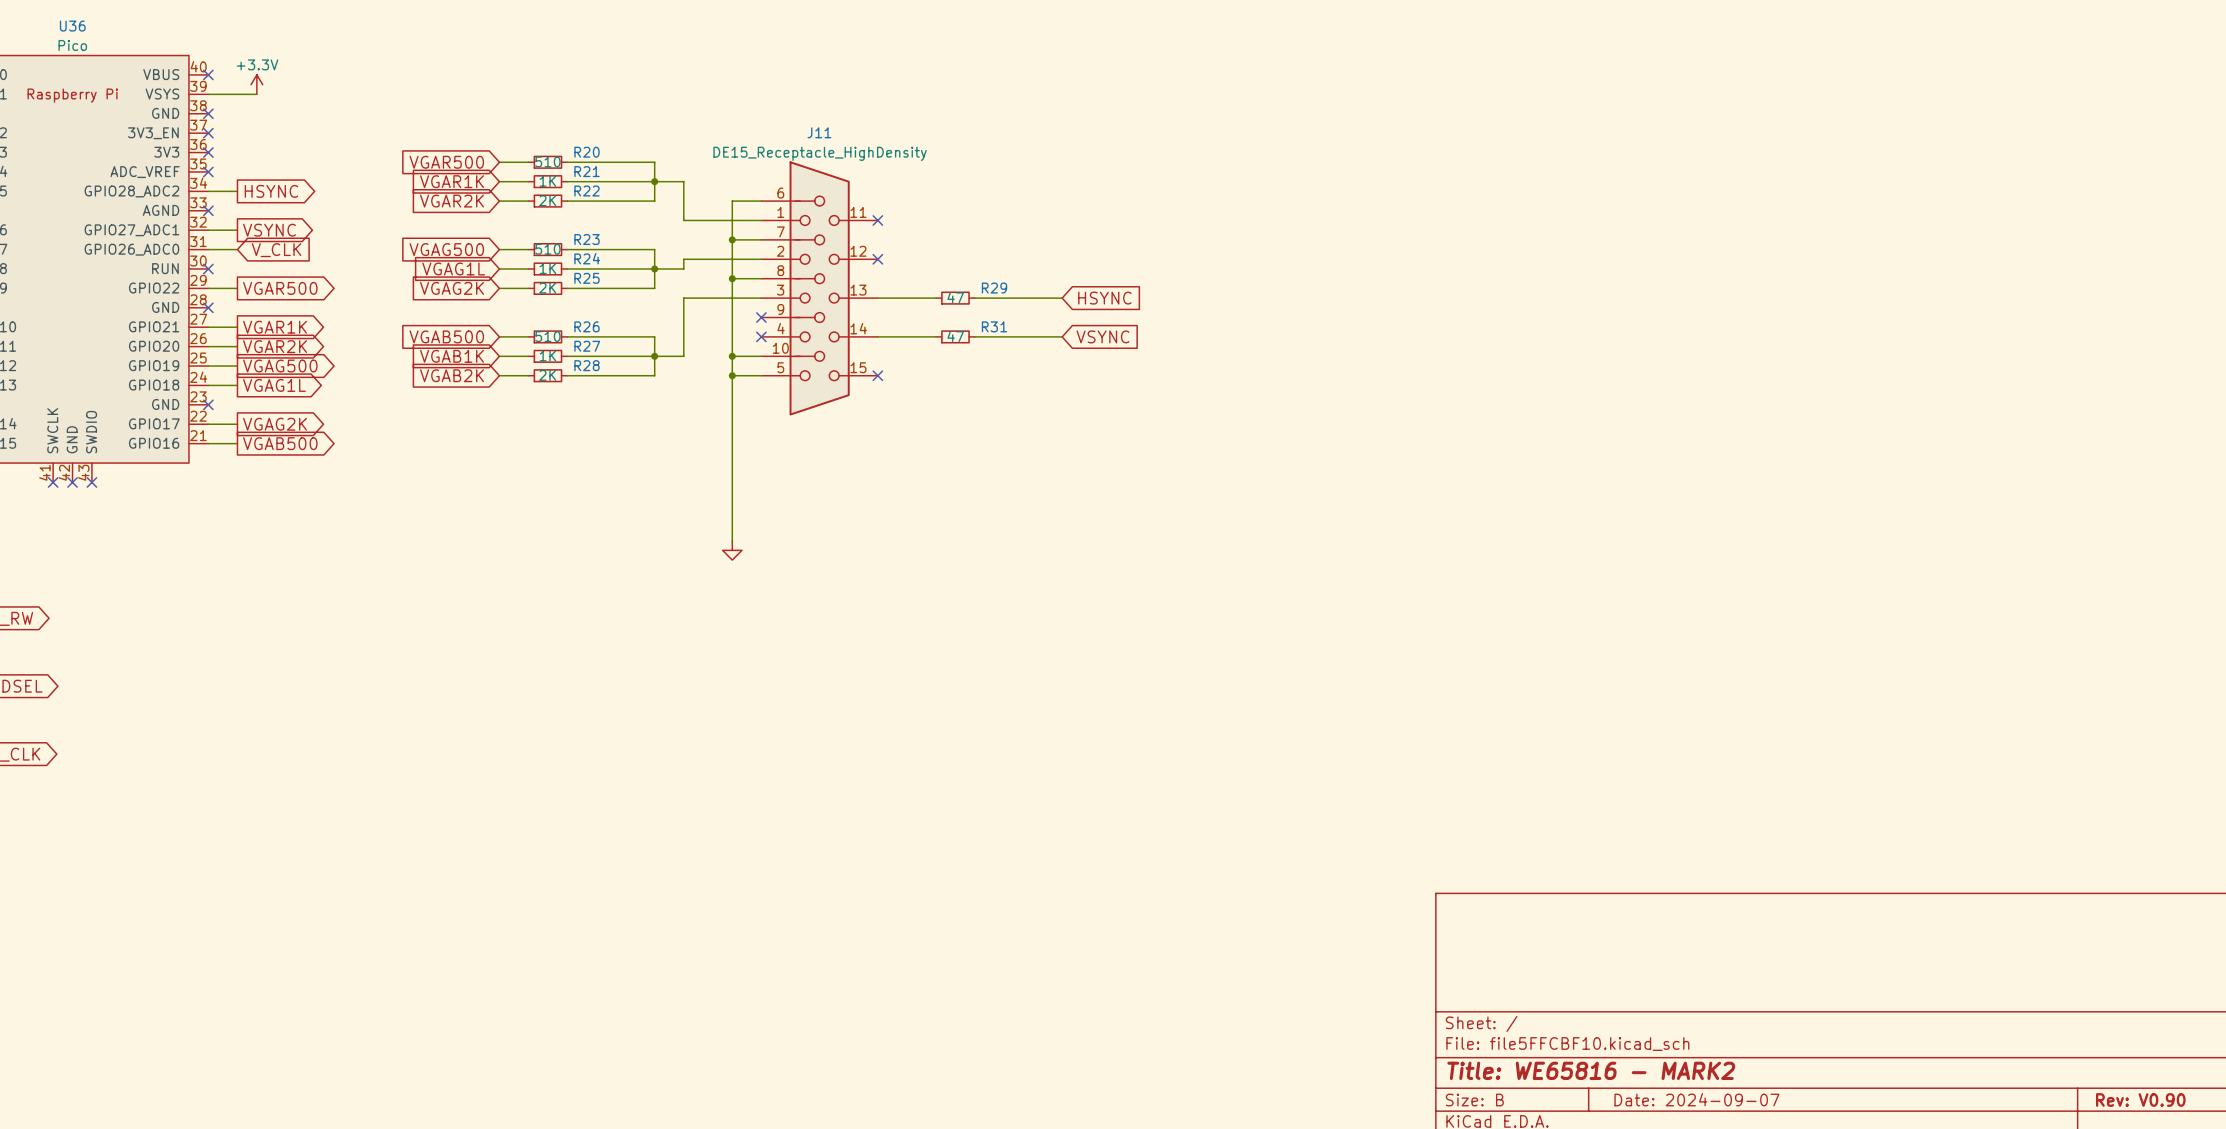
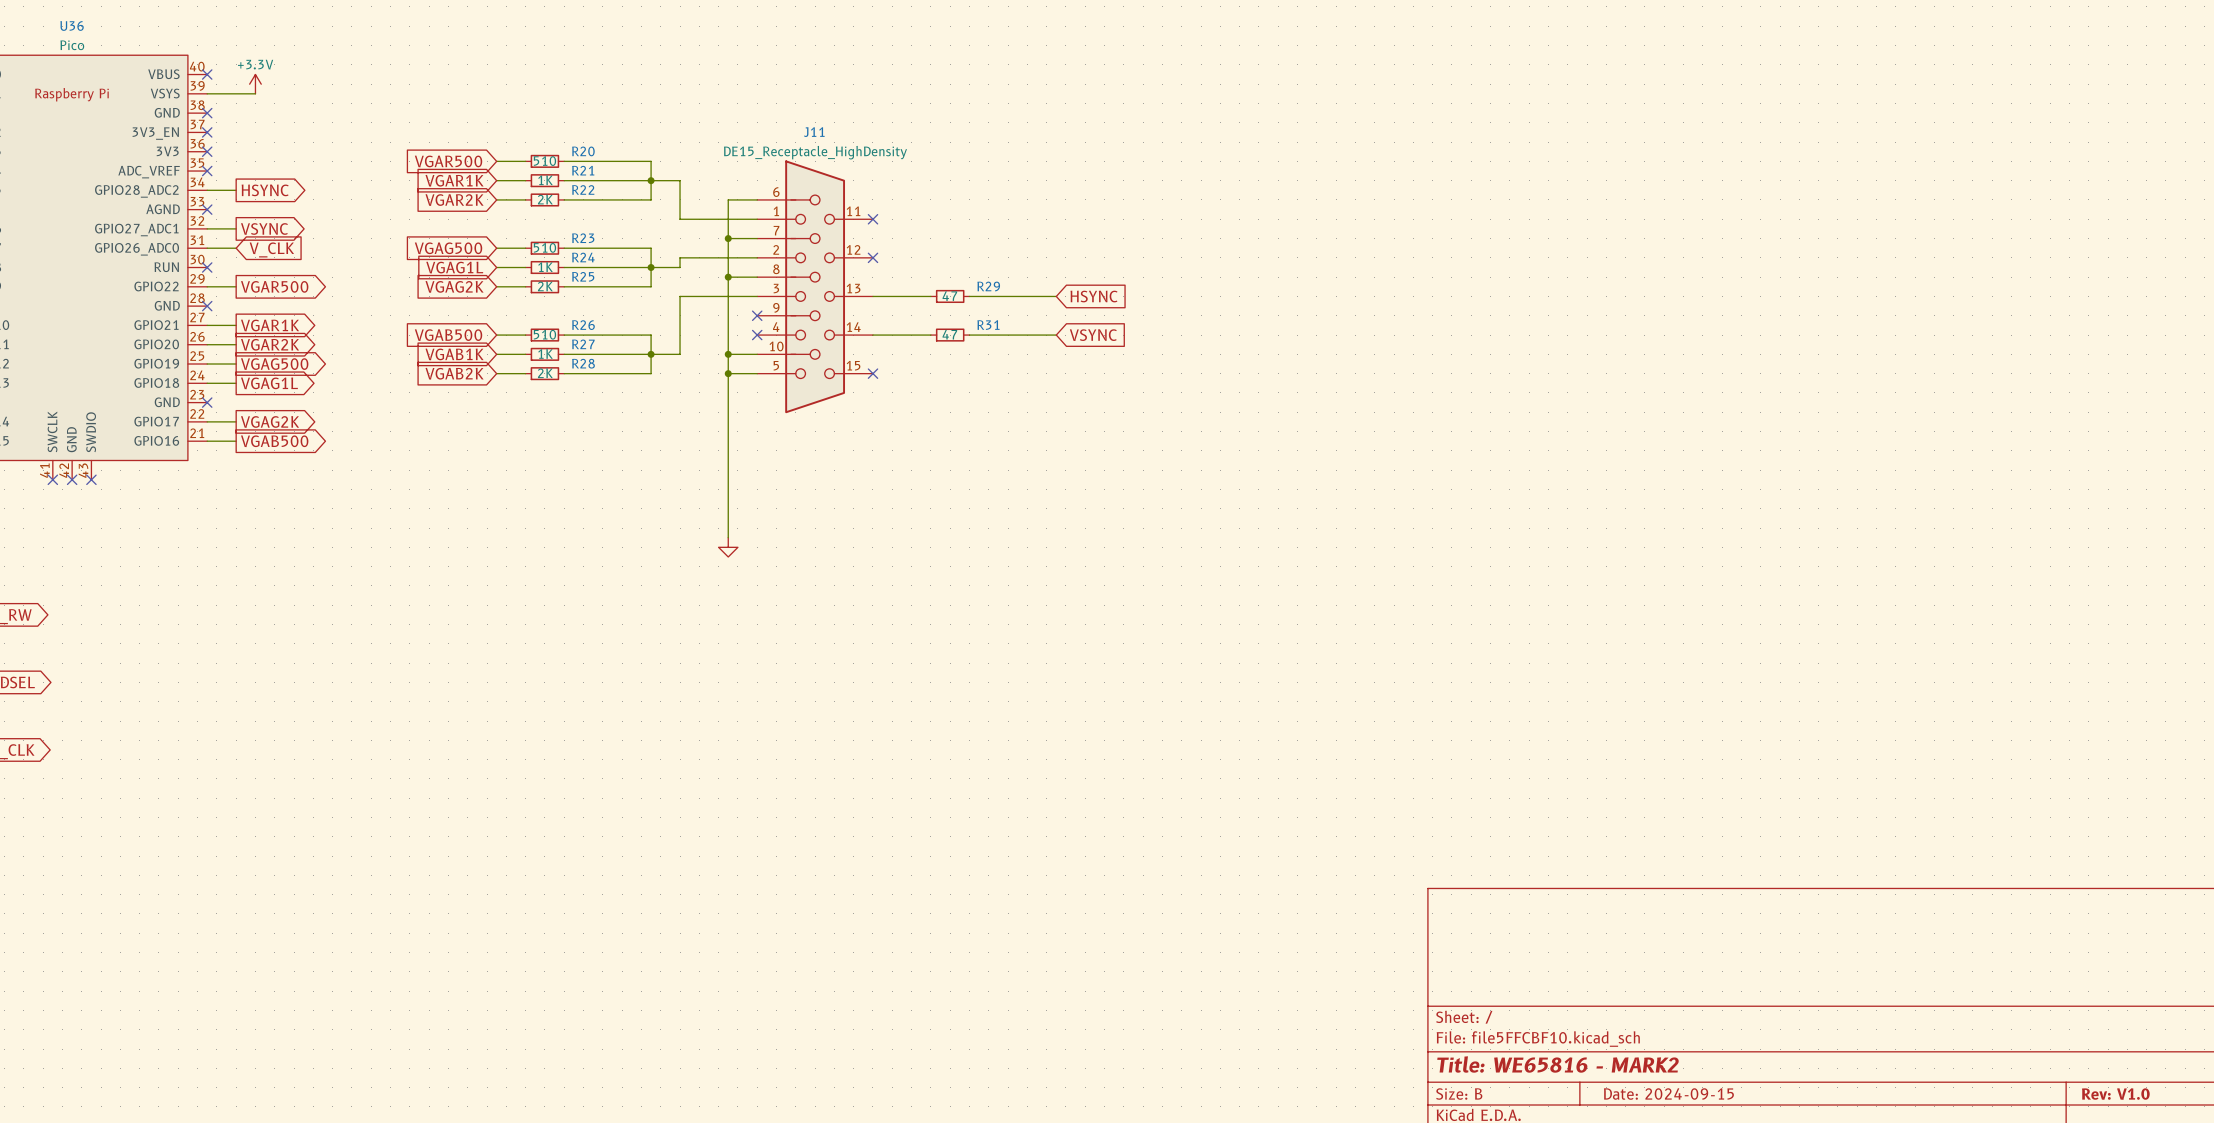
title block: Date: 2024-09-07 (1696, 1099) -> Date: 2024-09-15 (1668, 1094)
title block: Rev: V0.90 (2140, 1100) -> Rev: V1.0 (2115, 1094)

